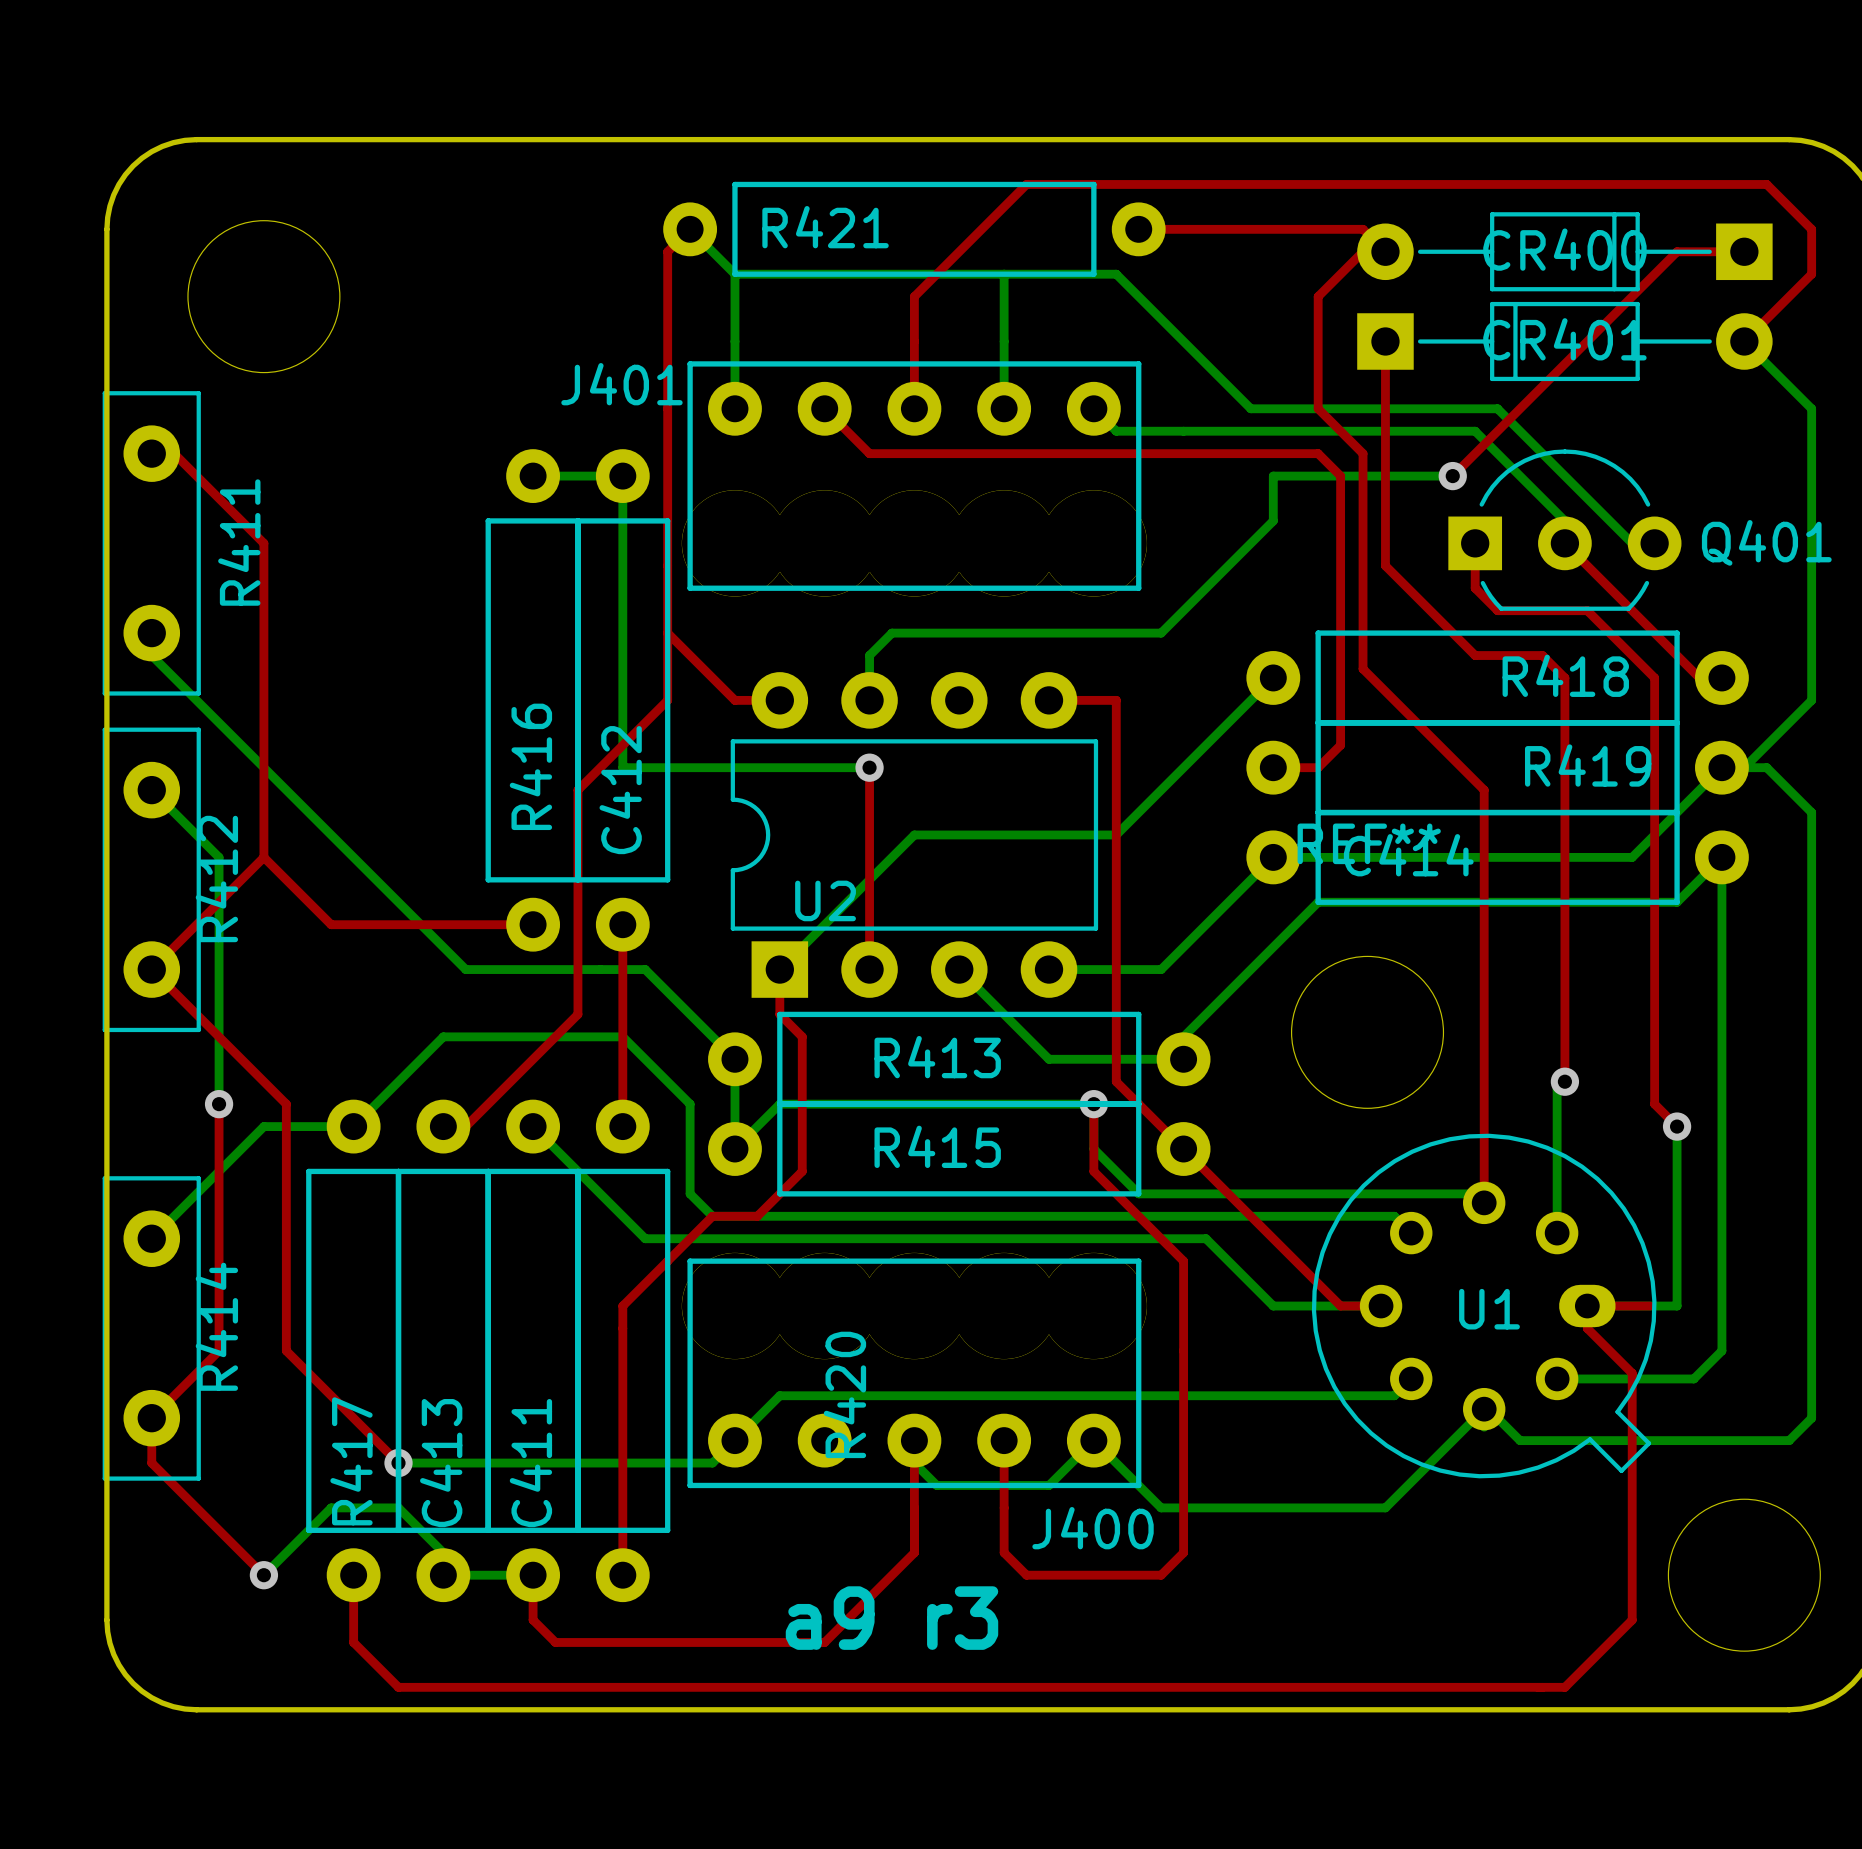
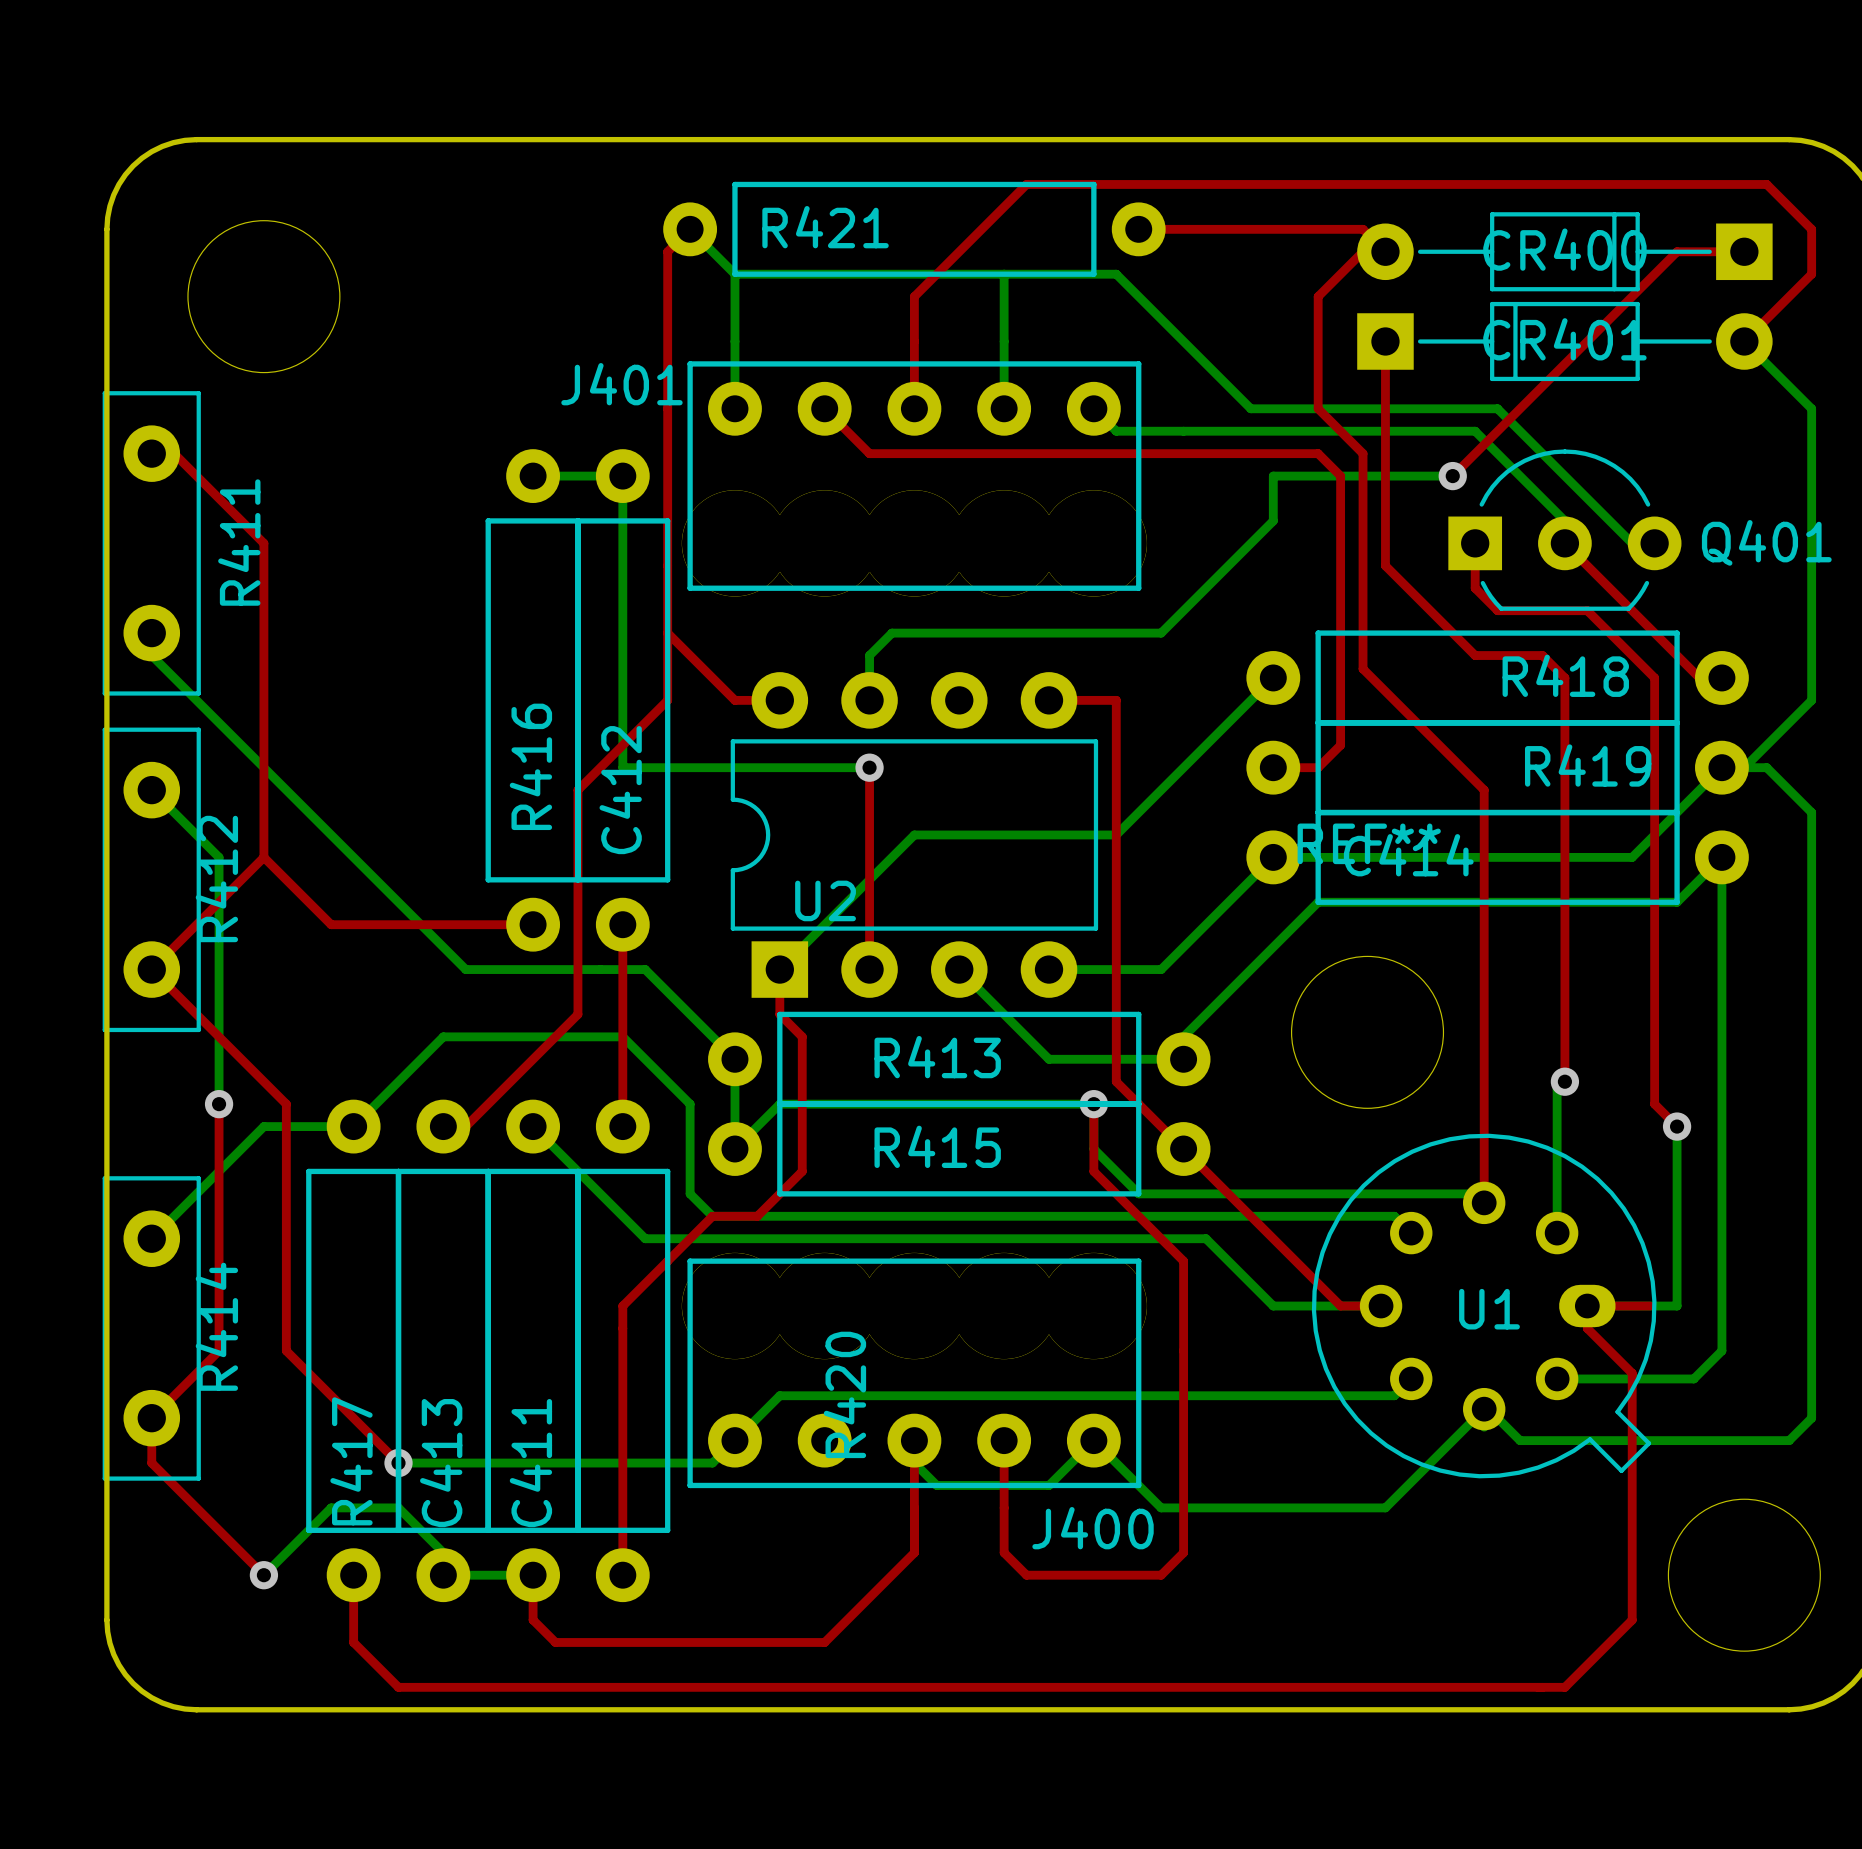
text: a9 r3 (891, 1618) -> none

